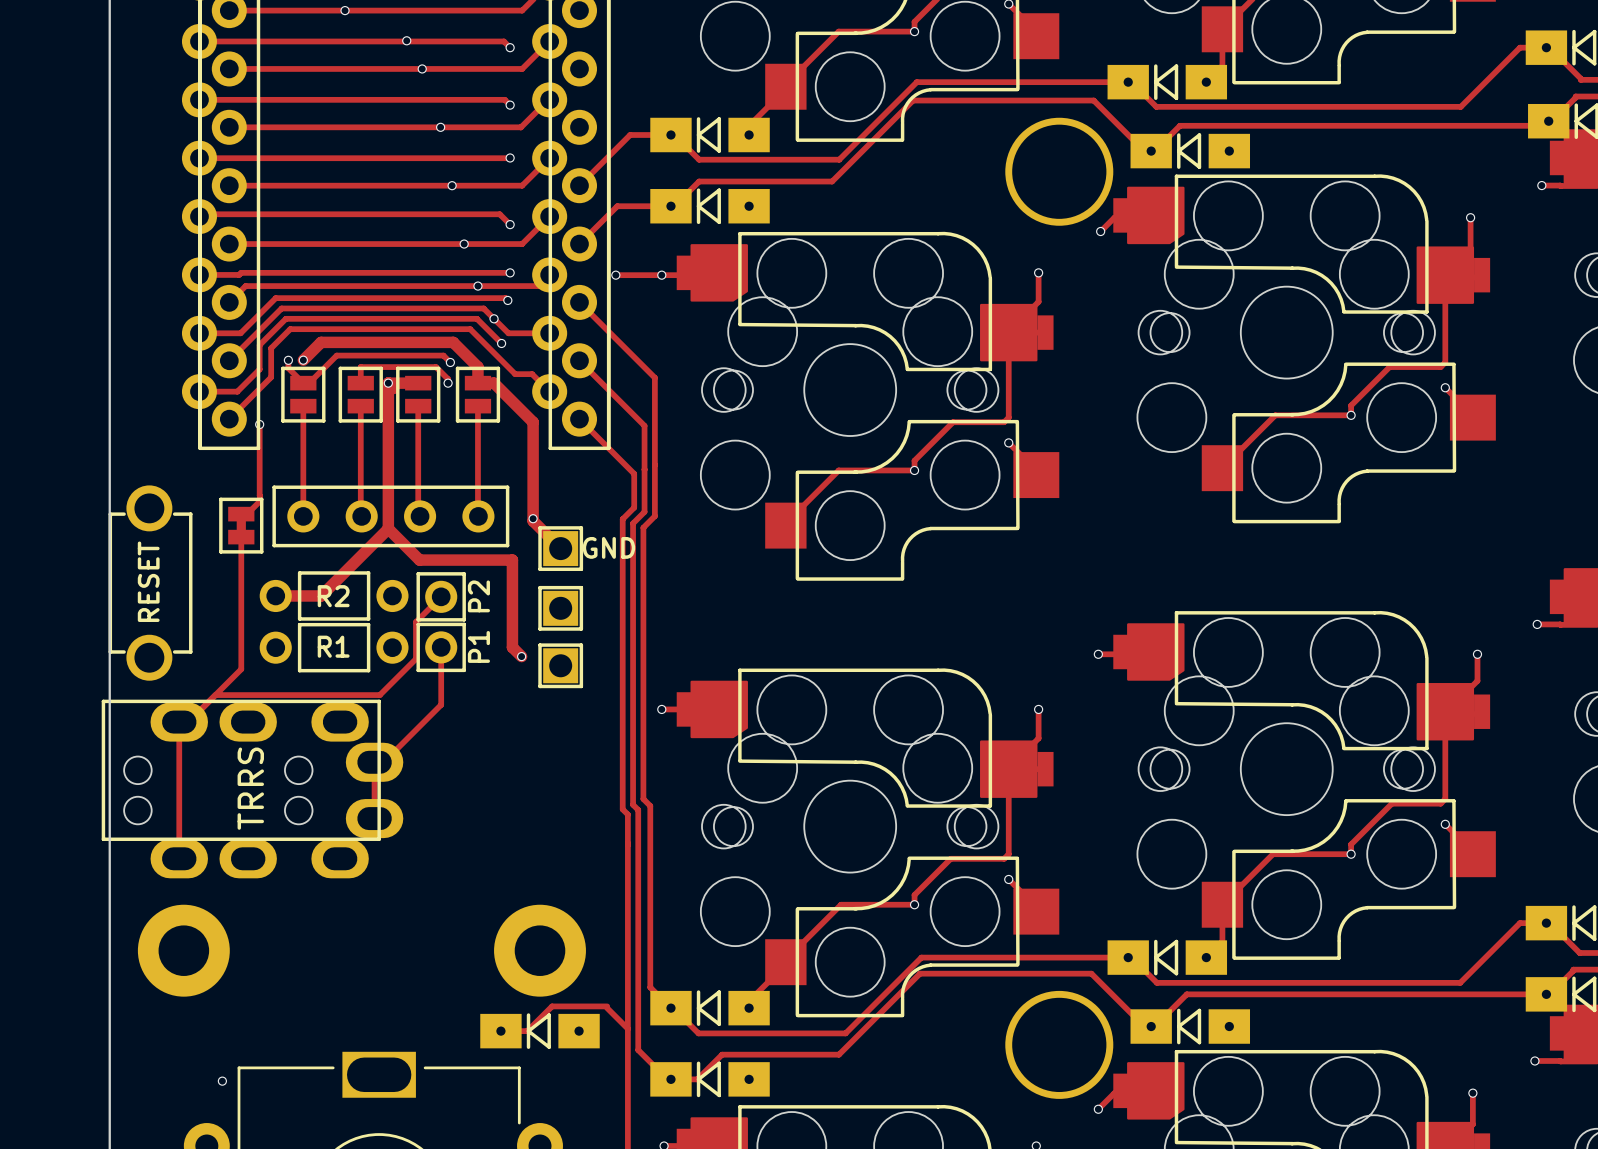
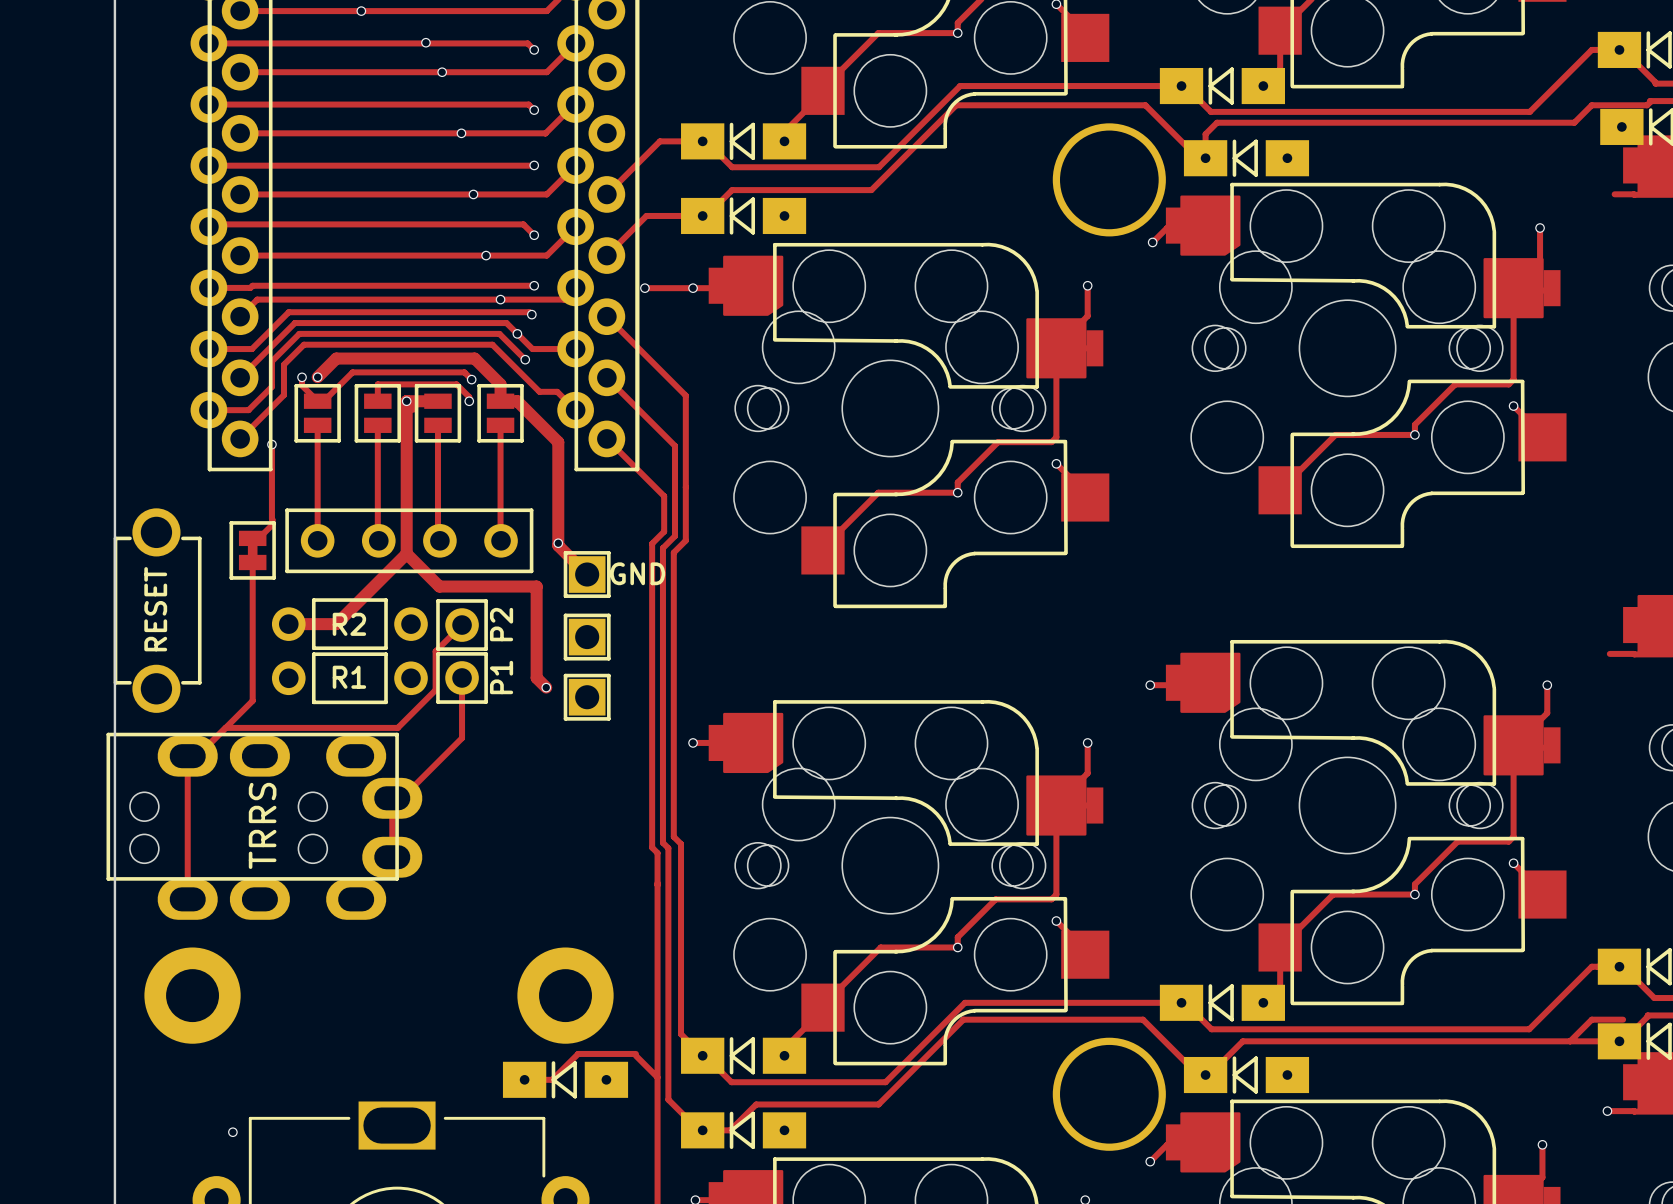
track: (1572, 100) (1552, 121) (1548, 121) (1544, 125) (1179, 125) (1154, 151) -> (1647, 105) (1591, 105) (1574, 122) (1217, 122) (1205, 134) (1205, 158)
via: (1541, 185) -> none
via: (1537, 624) -> none
track: none -> (1623, 1019) (1591, 1019) (1570, 1041)

